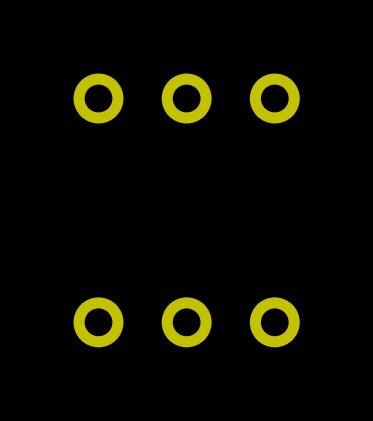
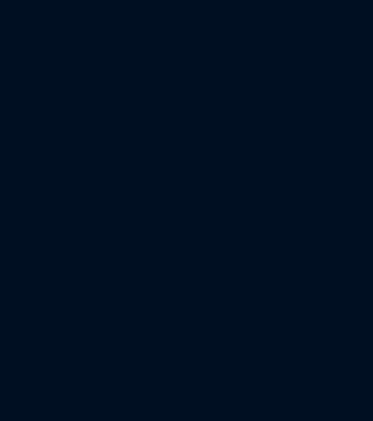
part: (186, 98) -> none
part: (186, 322) -> none

